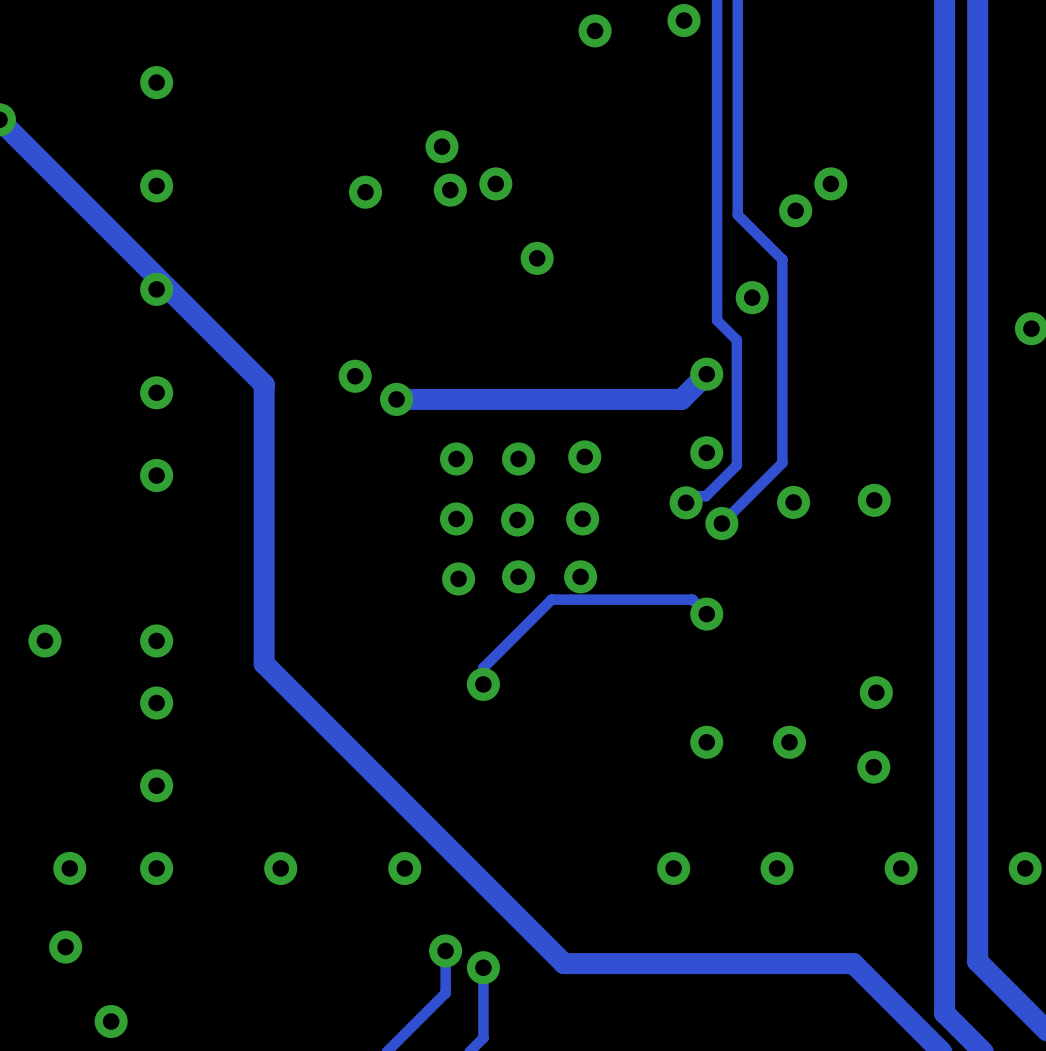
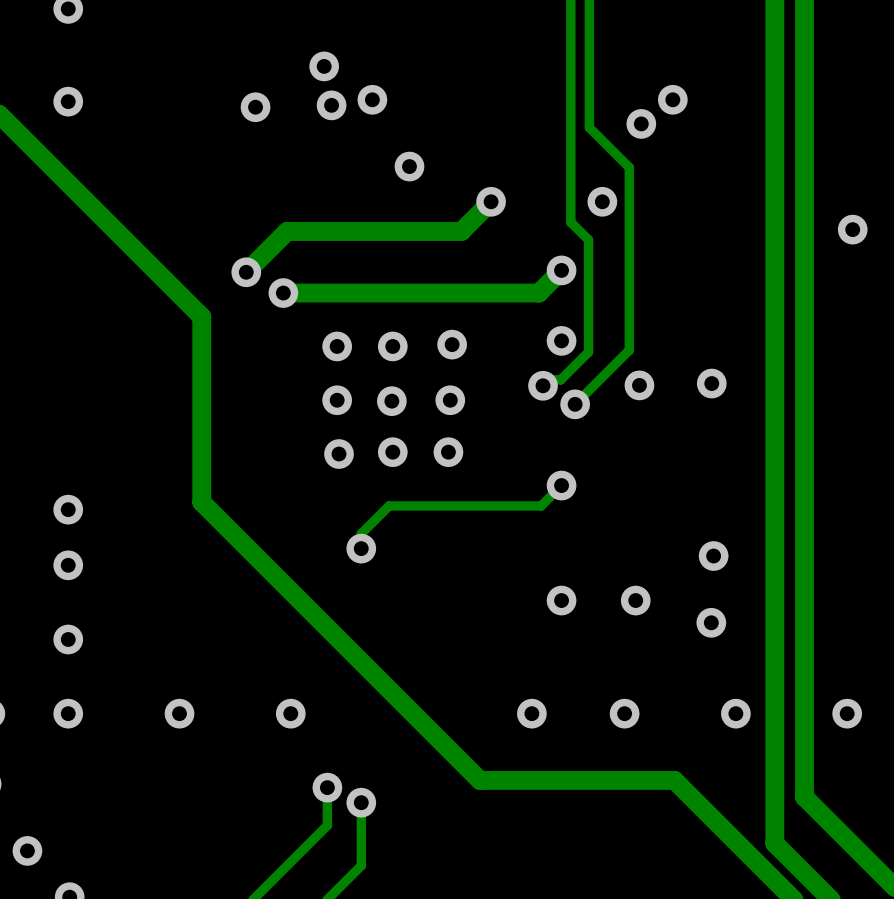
via: (156, 289) -> none
track: none -> (491, 201) (461, 231) (287, 231) (246, 272)
via: none -> (491, 201)
track: (264, 384) (264, 663) (564, 963) (853, 963) -> (164, 279) (201, 316) (201, 502) (479, 780) (674, 780) (693, 798)
via: (156, 392) -> none
via: (156, 475) -> none
track: (706, 614) (692, 599) (551, 599) (514, 636) -> (561, 485) (541, 505) (389, 505)

